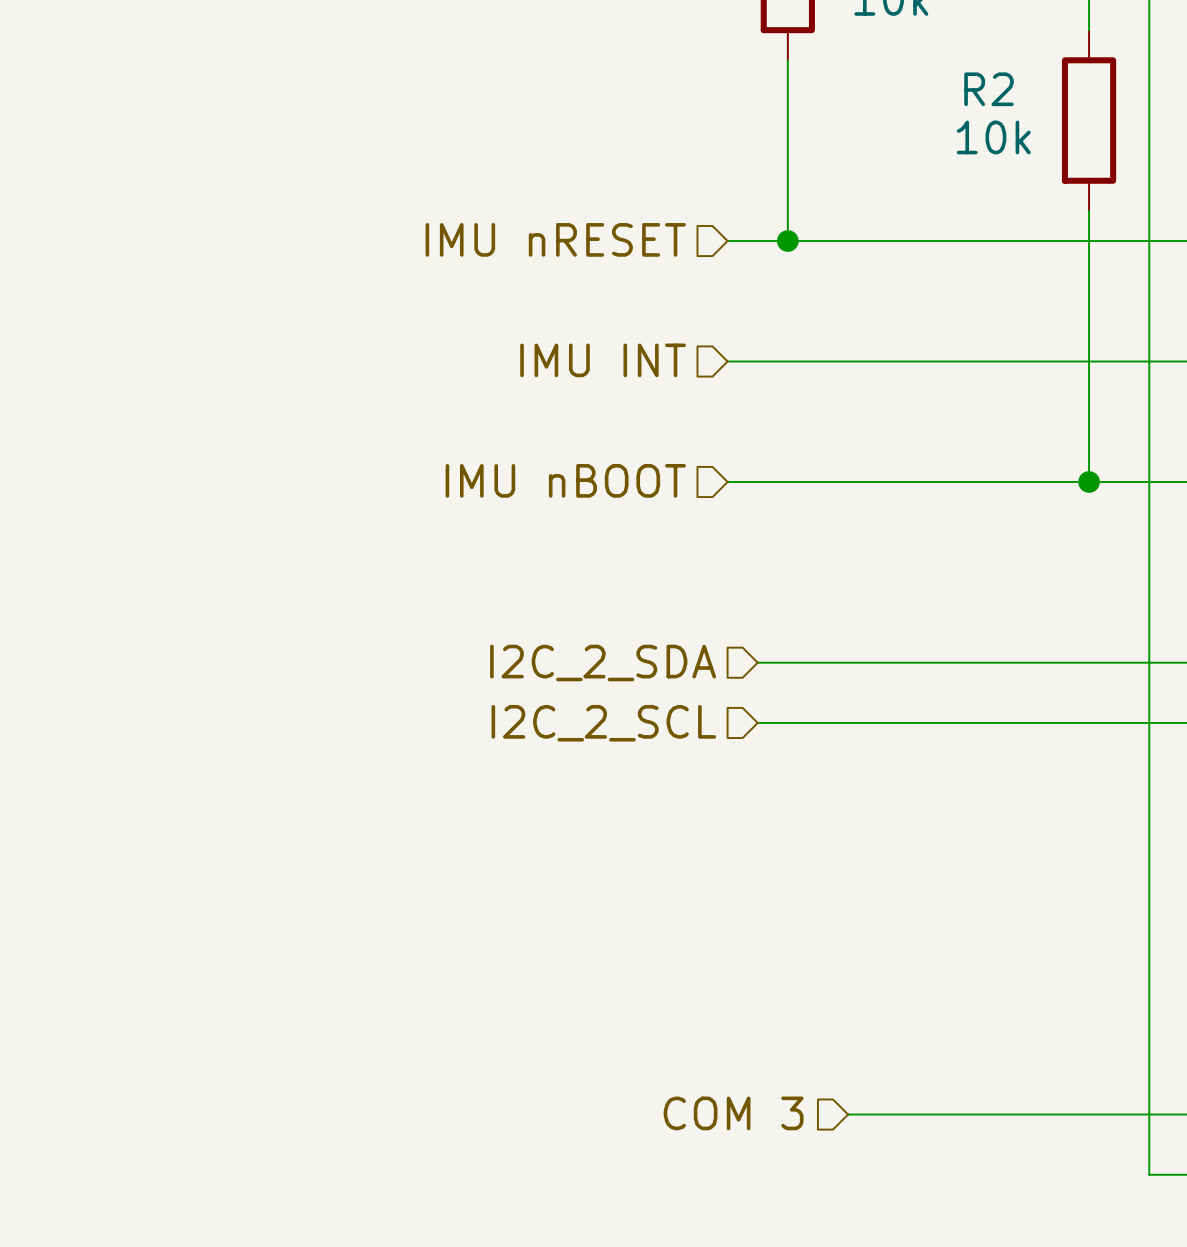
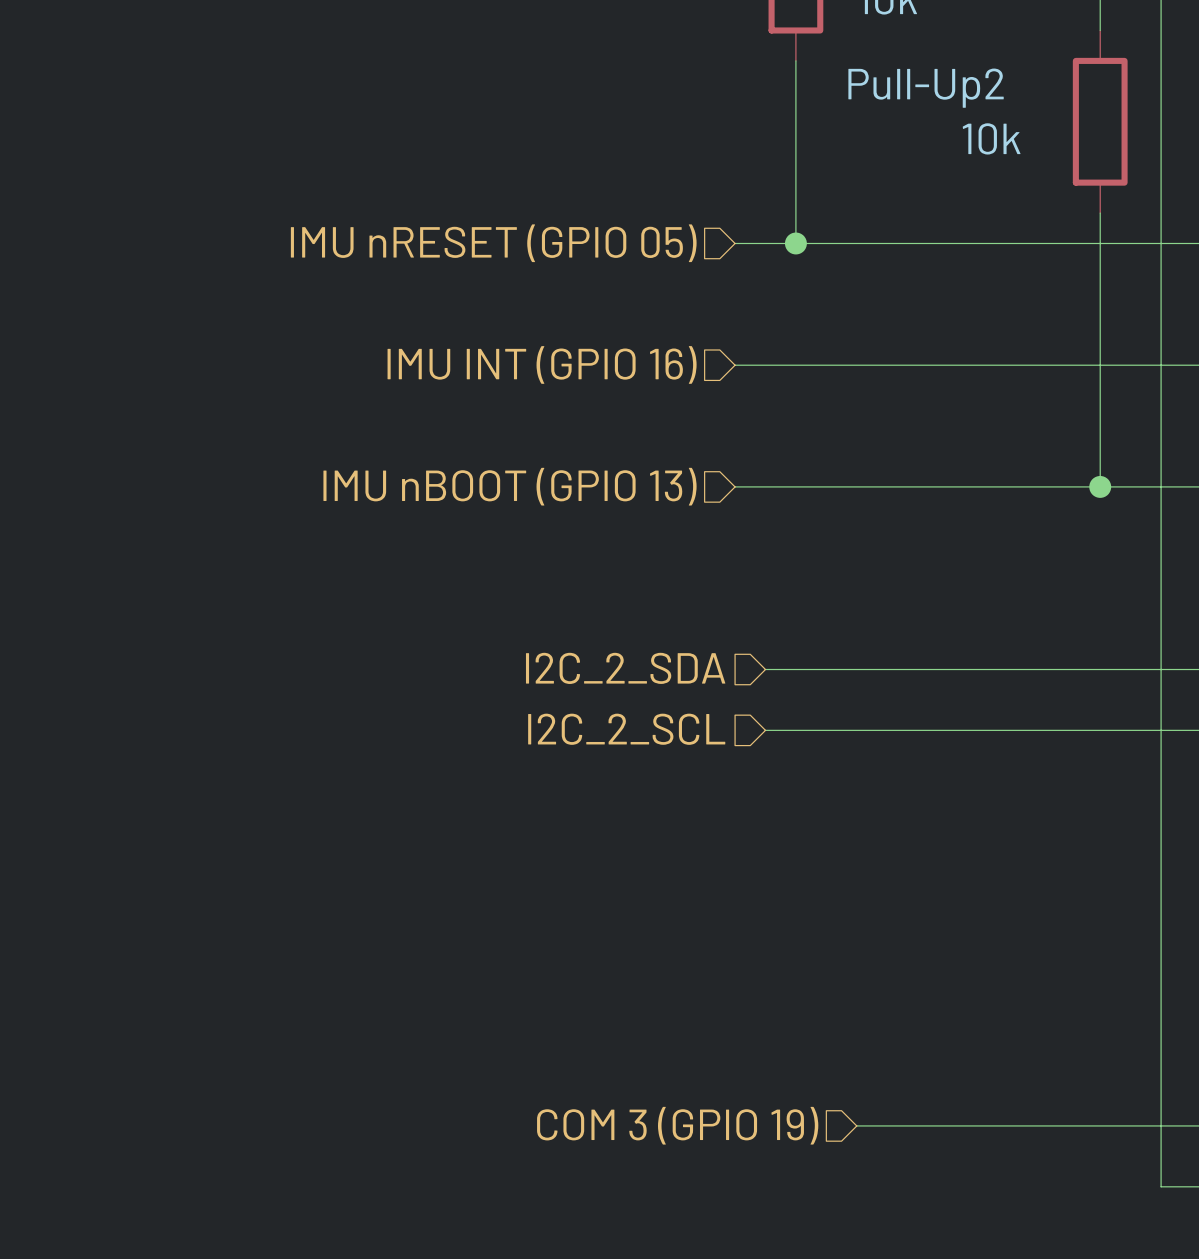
R2 name: R2 (989, 89) -> Pull-Up2 (926, 88)
hierarchical label: IMU nRESET (555, 239) -> IMU nRESET (GPIO 05) (493, 243)
hierarchical label: IMU INT (603, 360) -> IMU INT (GPIO 16) (542, 364)
hierarchical label: IMU nBOOT (565, 480) -> IMU nBOOT (GPIO 13) (510, 486)
hierarchical label: COM 3 (733, 1113) -> COM 3 (GPIO 19) (677, 1125)

